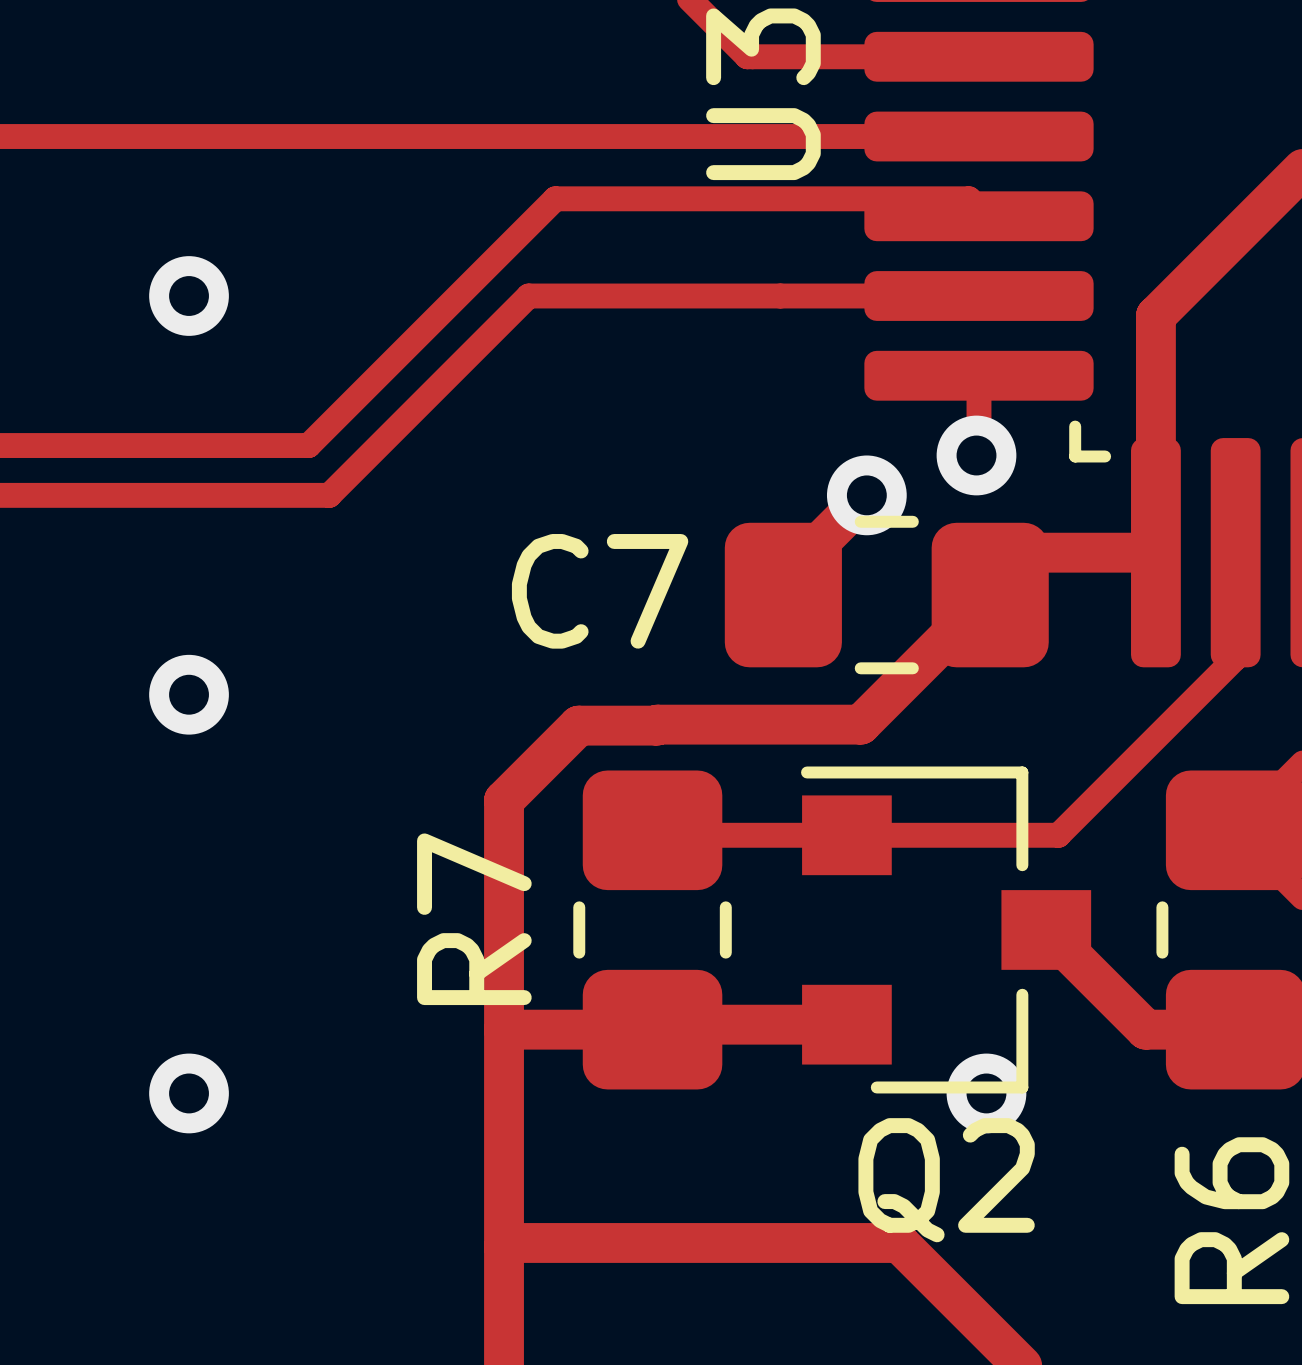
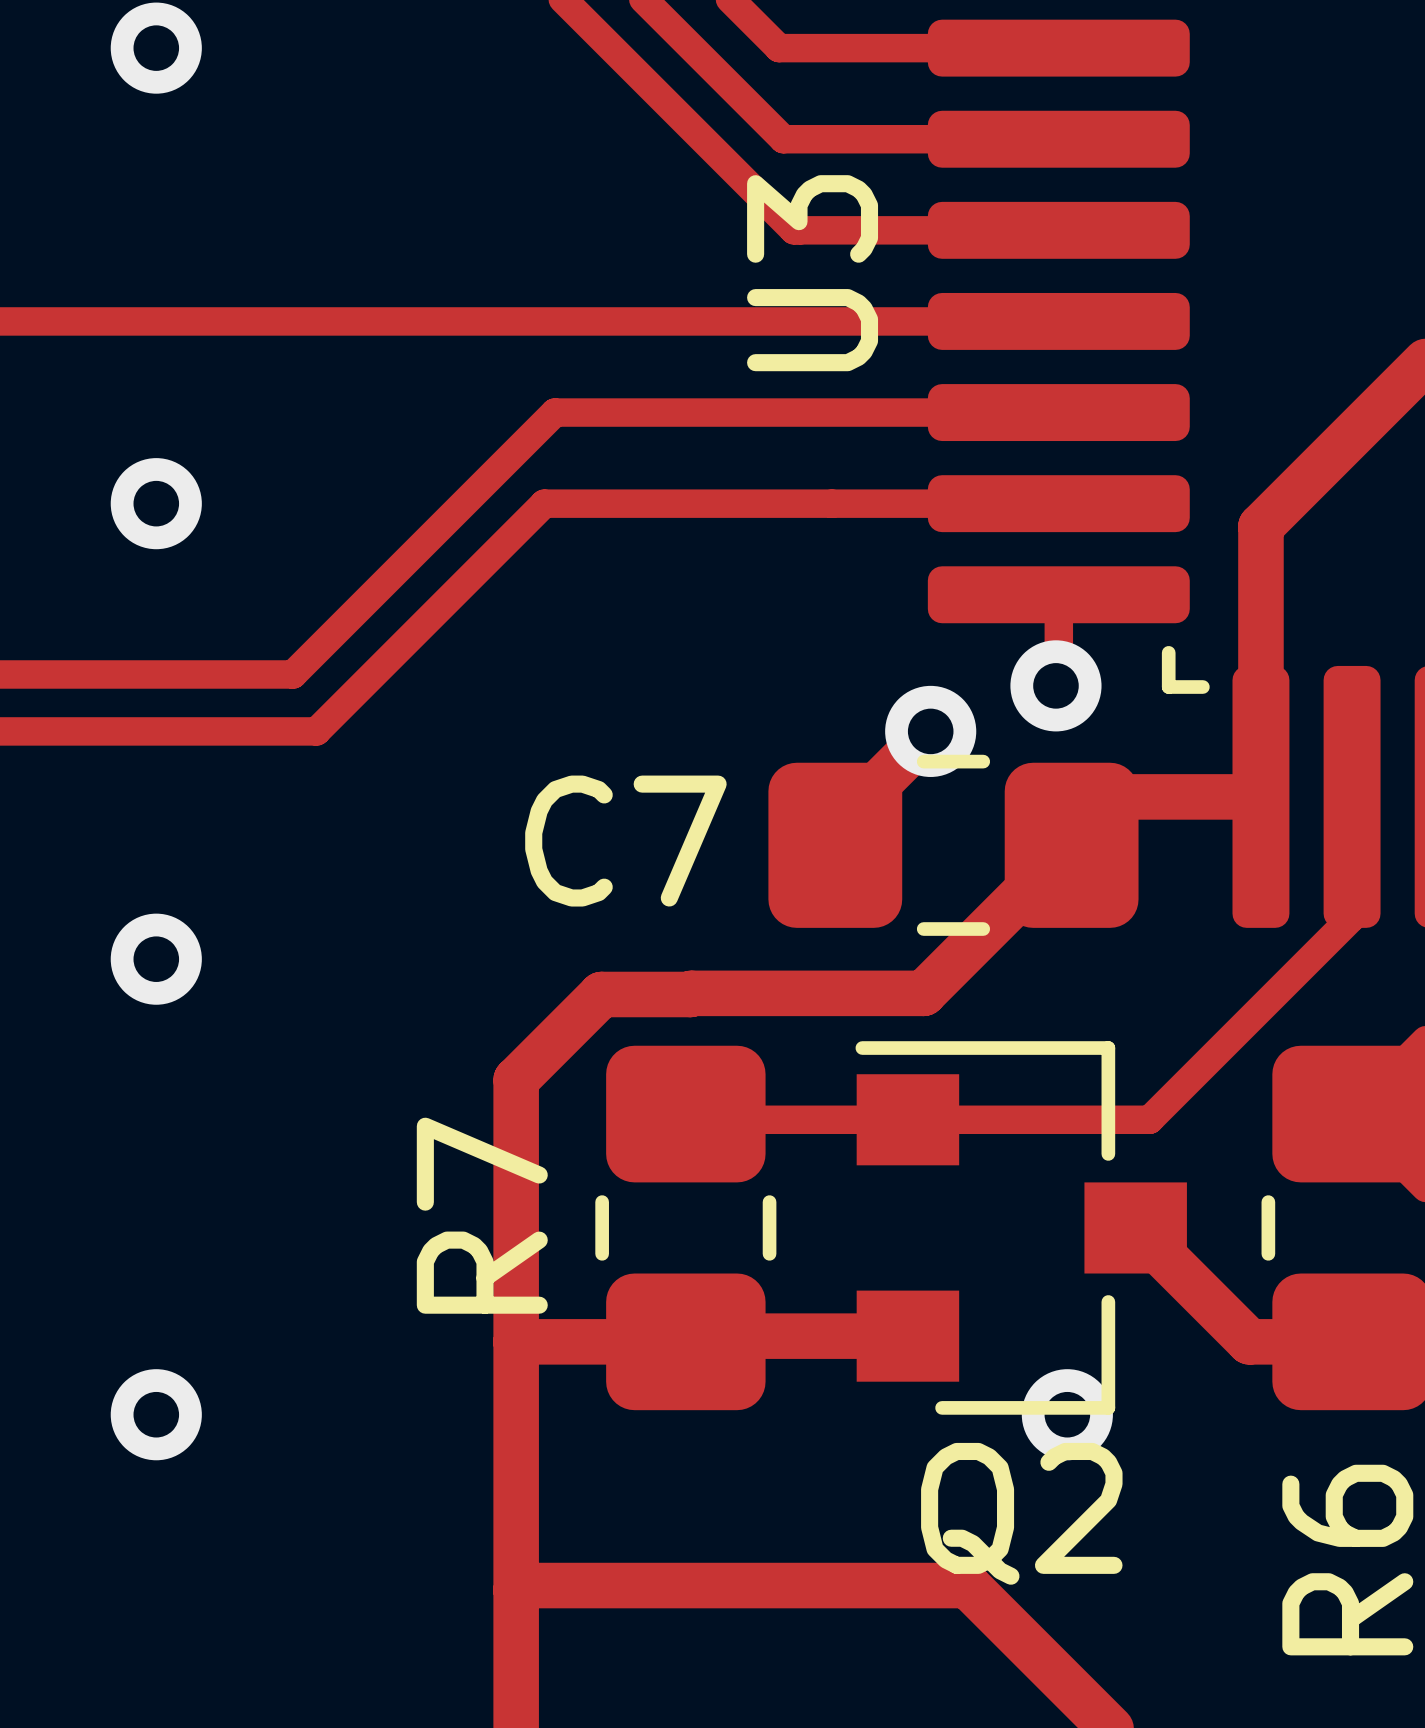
top track: (978, 208) (969, 198) (555, 198) (537, 216) -> (1058, 404) (1050, 412) (554, 412)

